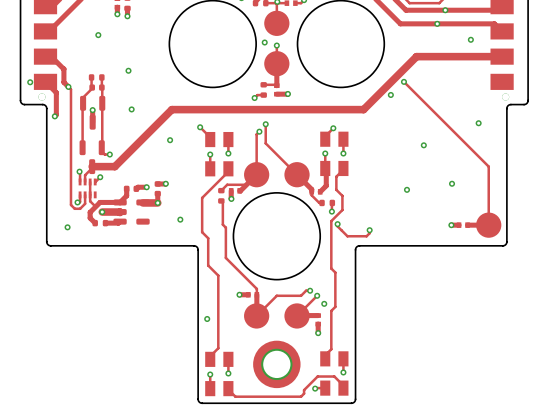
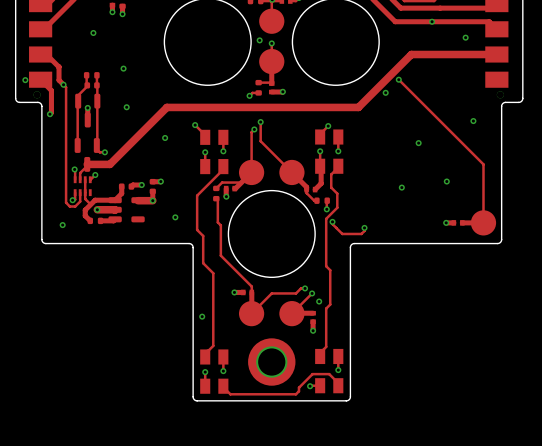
via: (445, 10) -> none

